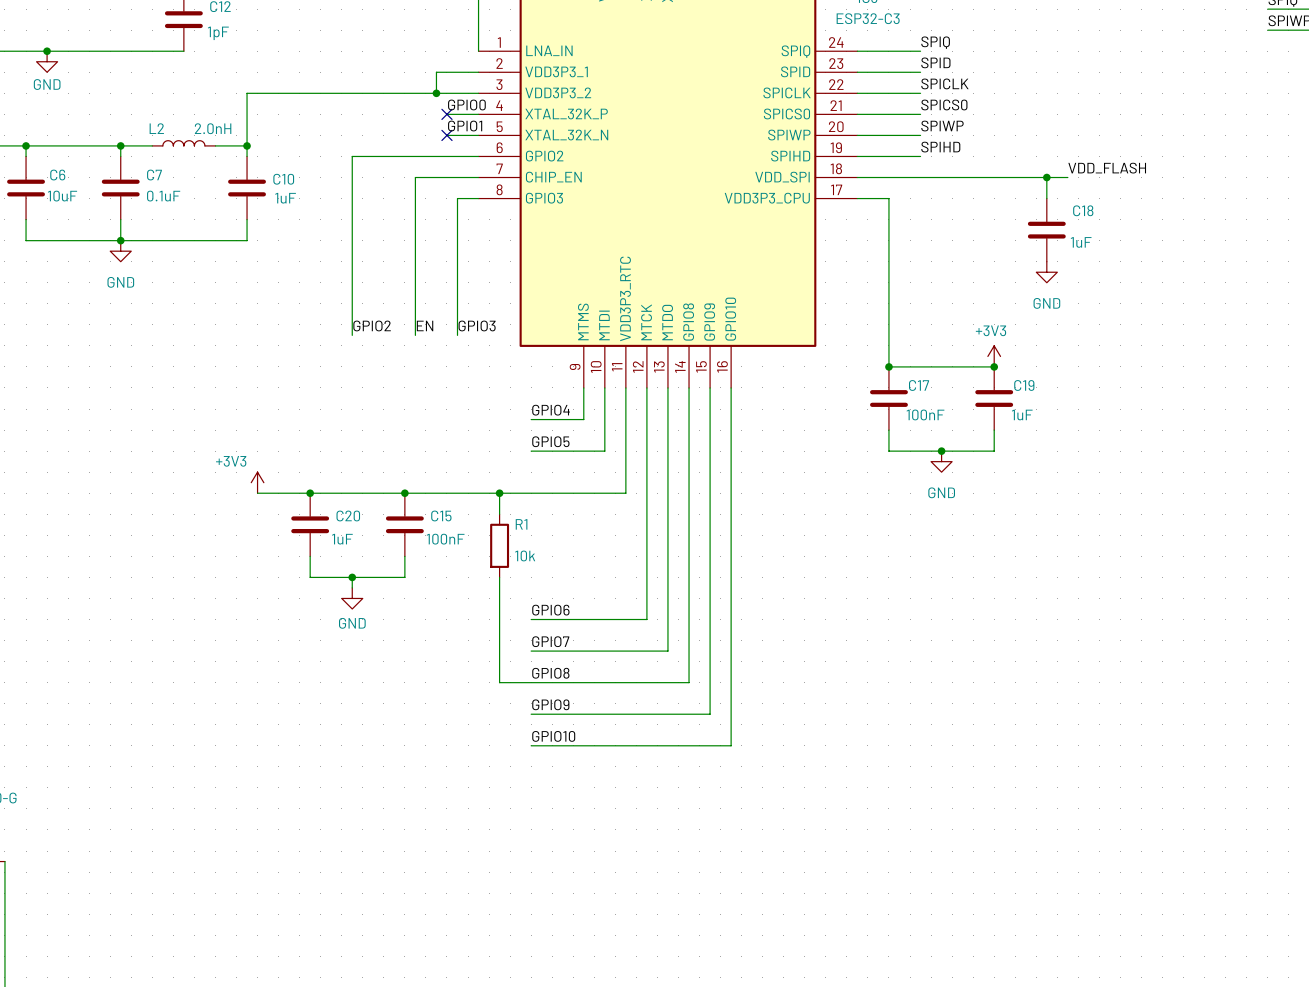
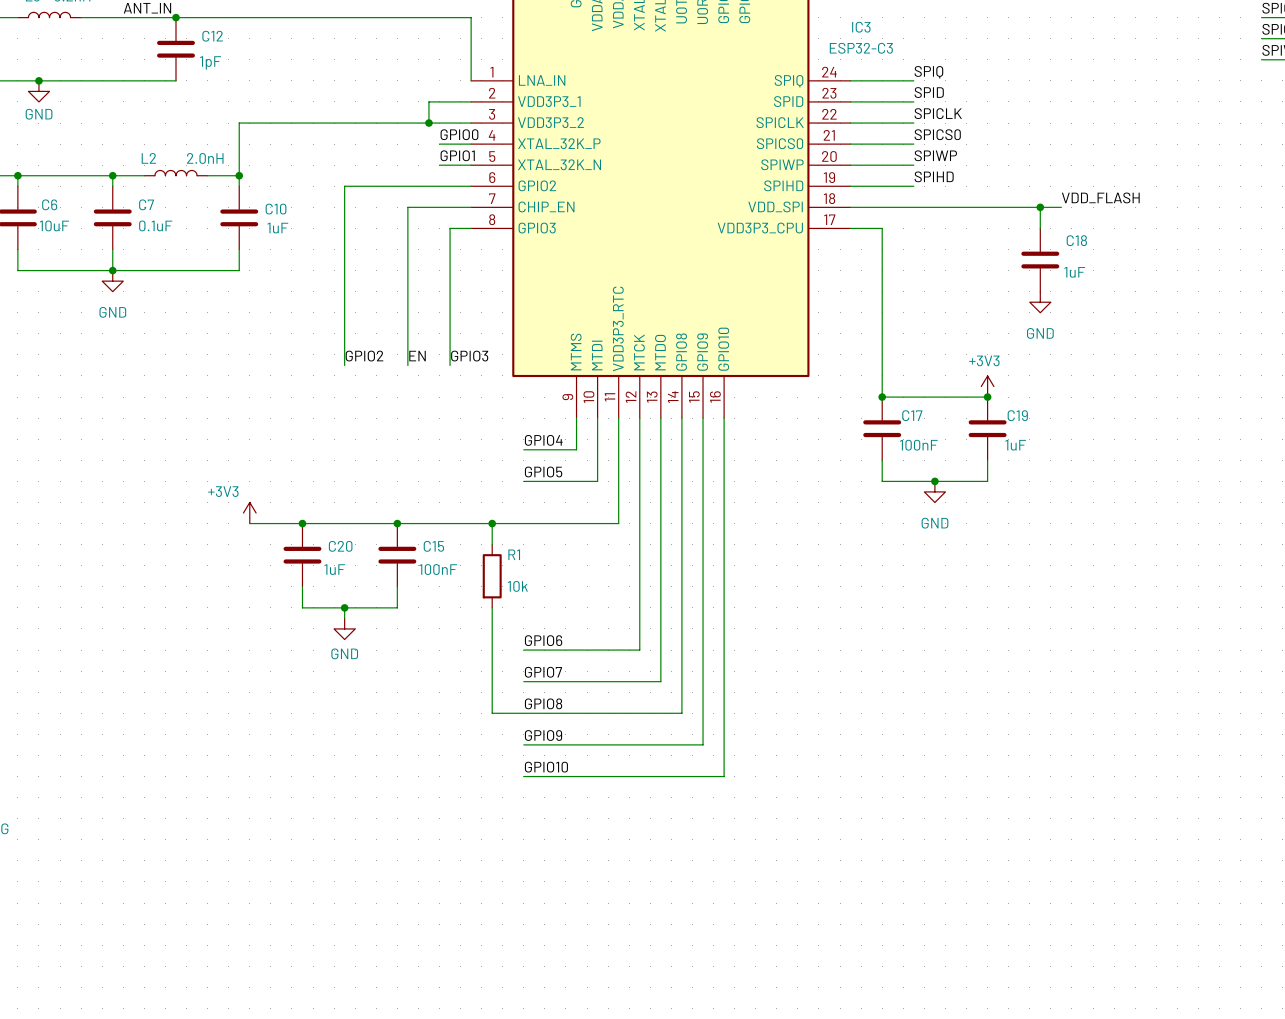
no-connect mark: (446, 114) -> none
no-connect mark: (446, 135) -> none

